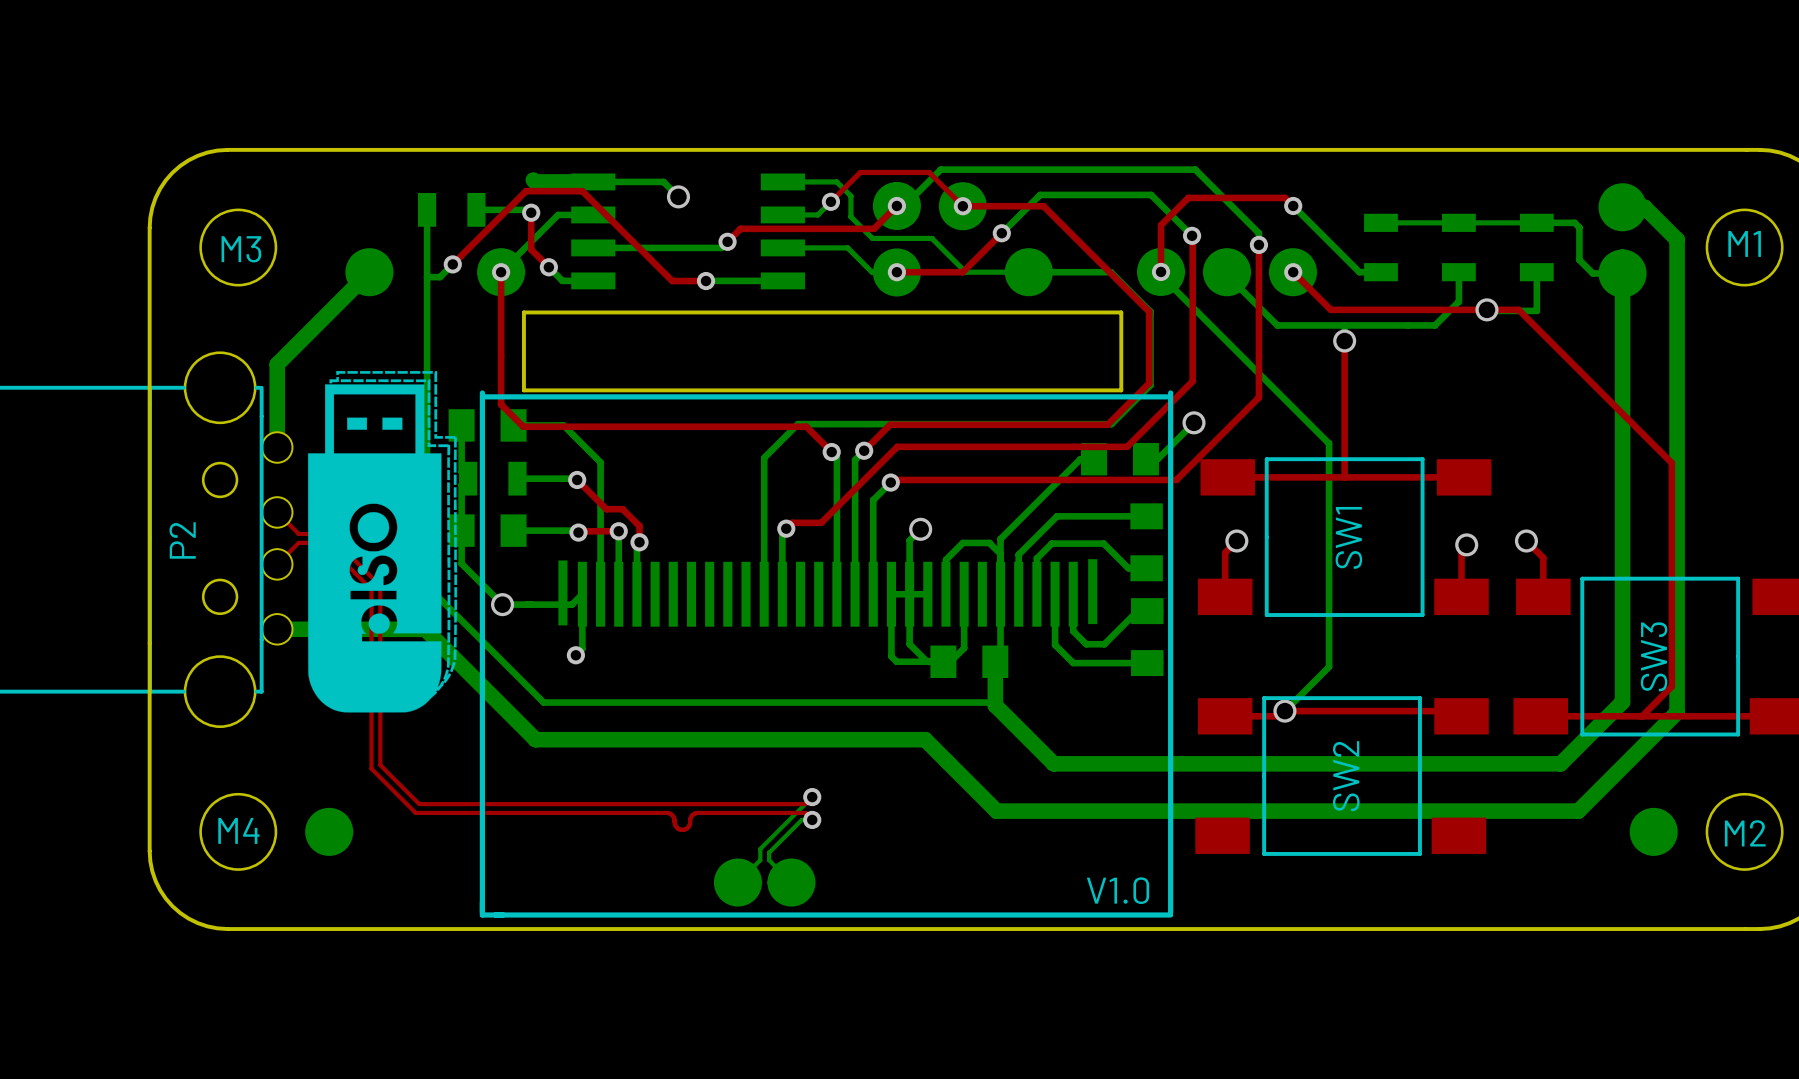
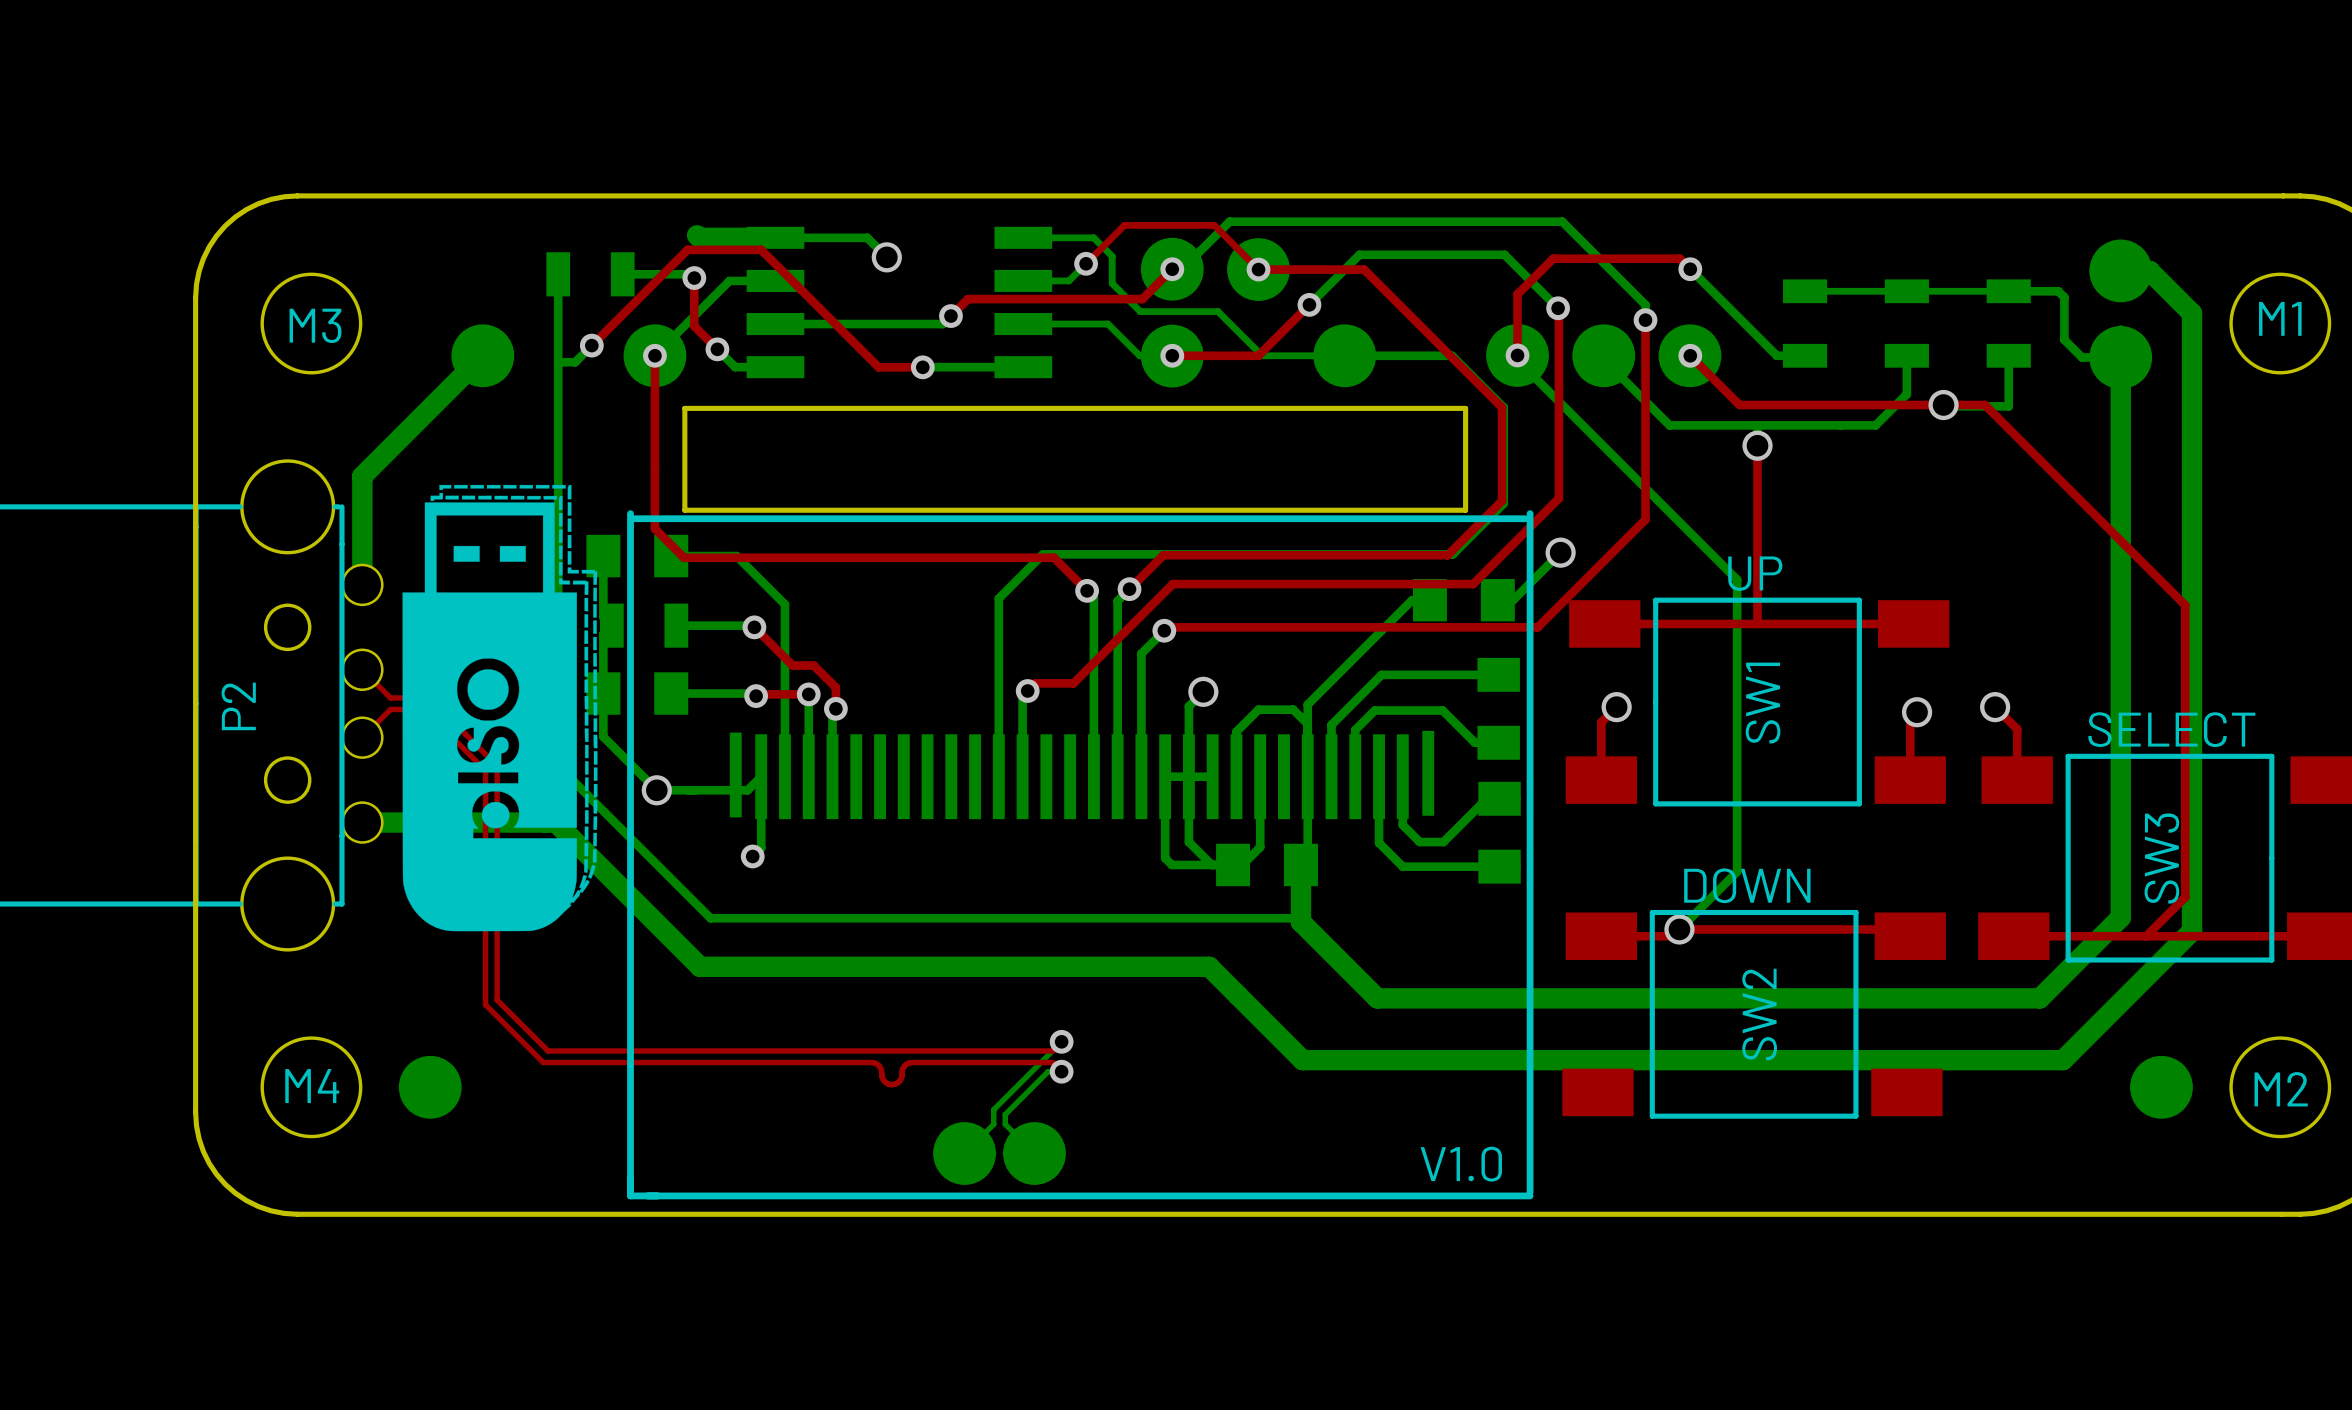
text: none -> UP (1755, 573)
text: none -> SELECT (2171, 729)
text: none -> DOWN (1747, 885)

